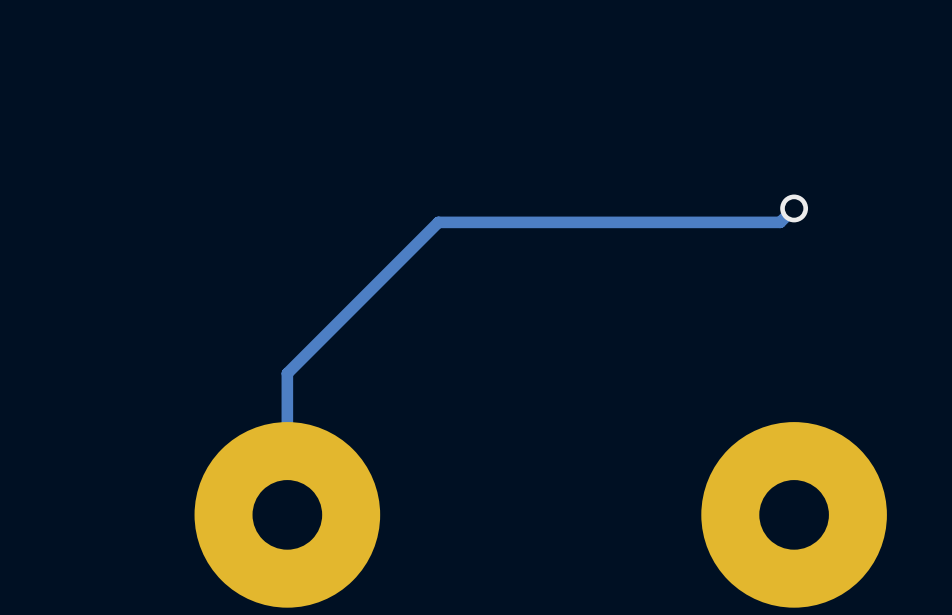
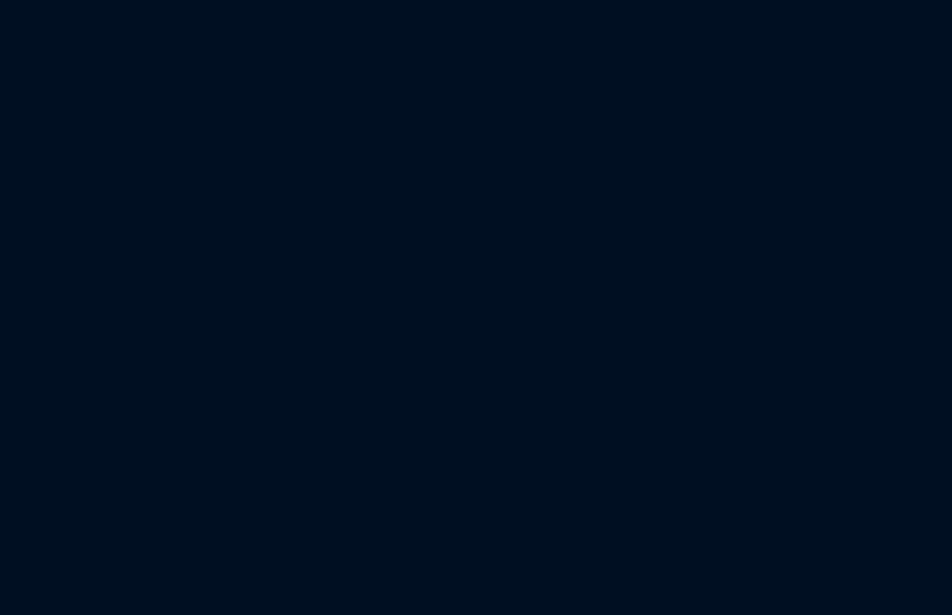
track: (794, 208) (780, 222) (438, 222) (287, 373) (287, 514) -> none
via: (794, 208) -> none
part: (287, 514) -> none
part: (794, 514) -> none

